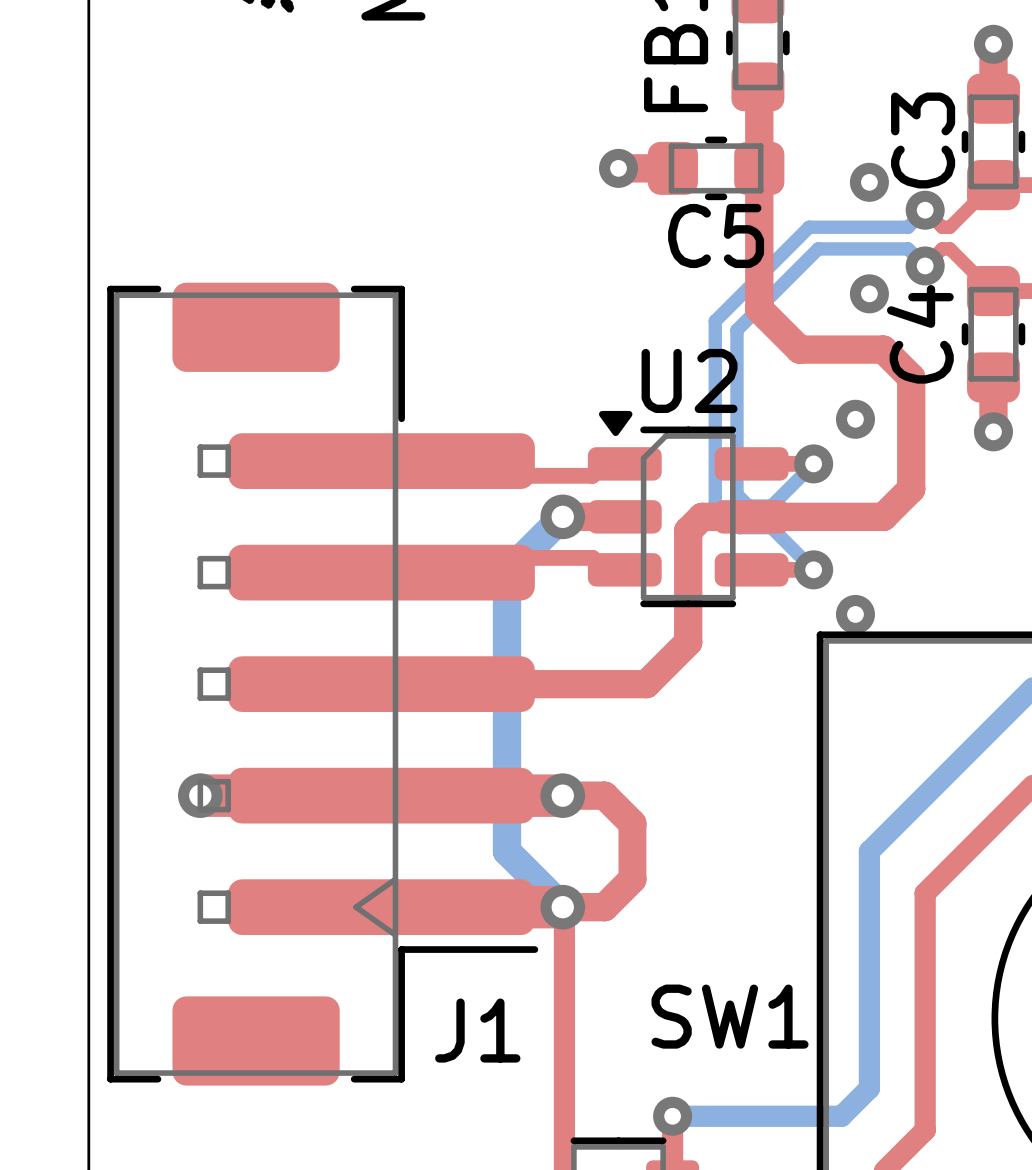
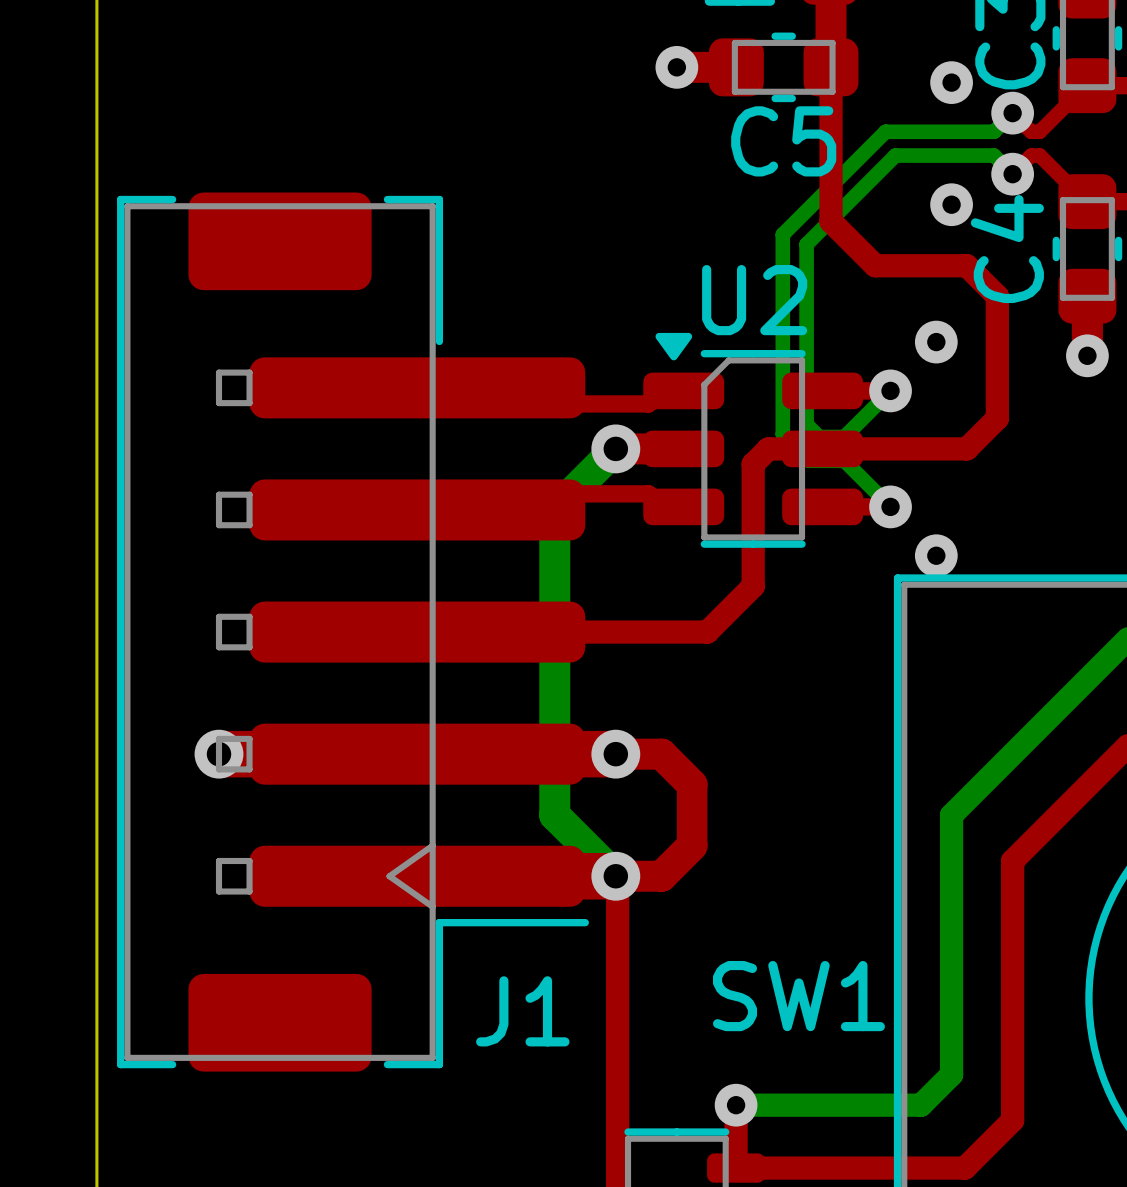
top track width: thick (759, 168) (759, 309) (799, 349) (883, 349) (911, 377) (911, 488) (883, 516) (702, 516) (688, 530) (688, 642) (646, 684) (353, 684) -> thin (831, 67) (831, 221) (875, 265) (966, 265) (997, 296) (997, 418) (966, 448) (768, 448) (753, 464) (753, 586) (707, 632) (386, 632)

